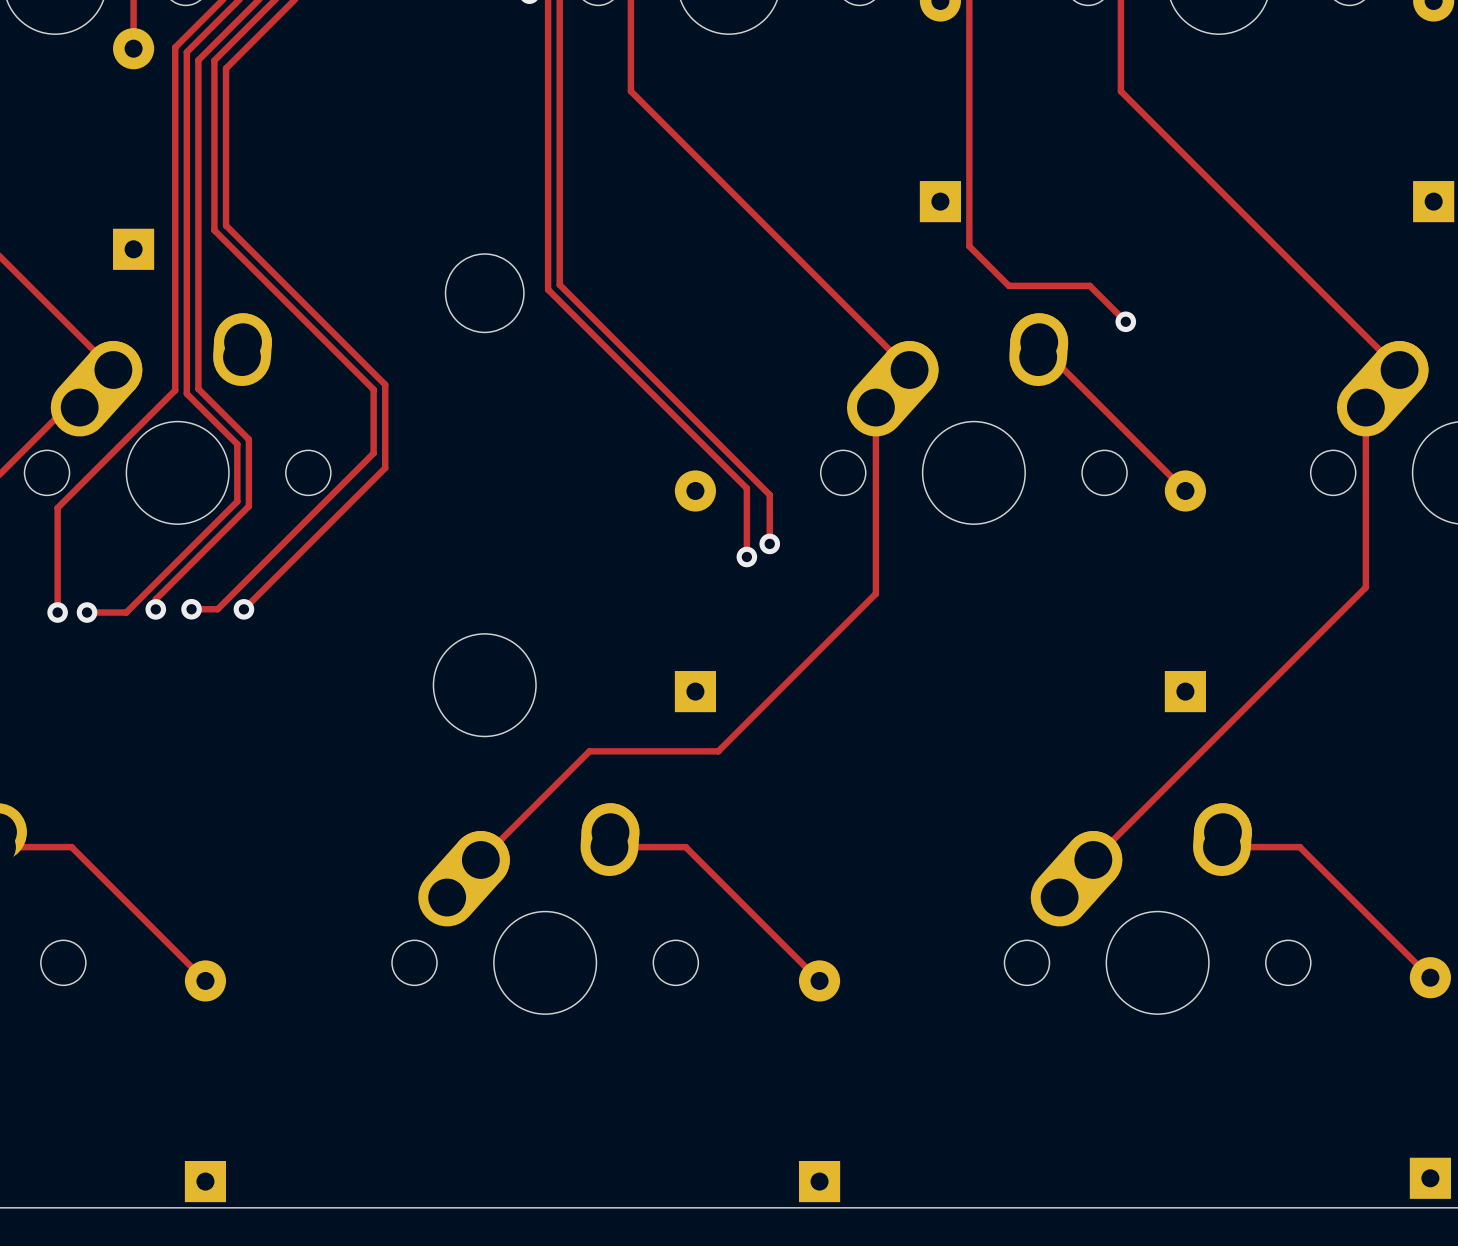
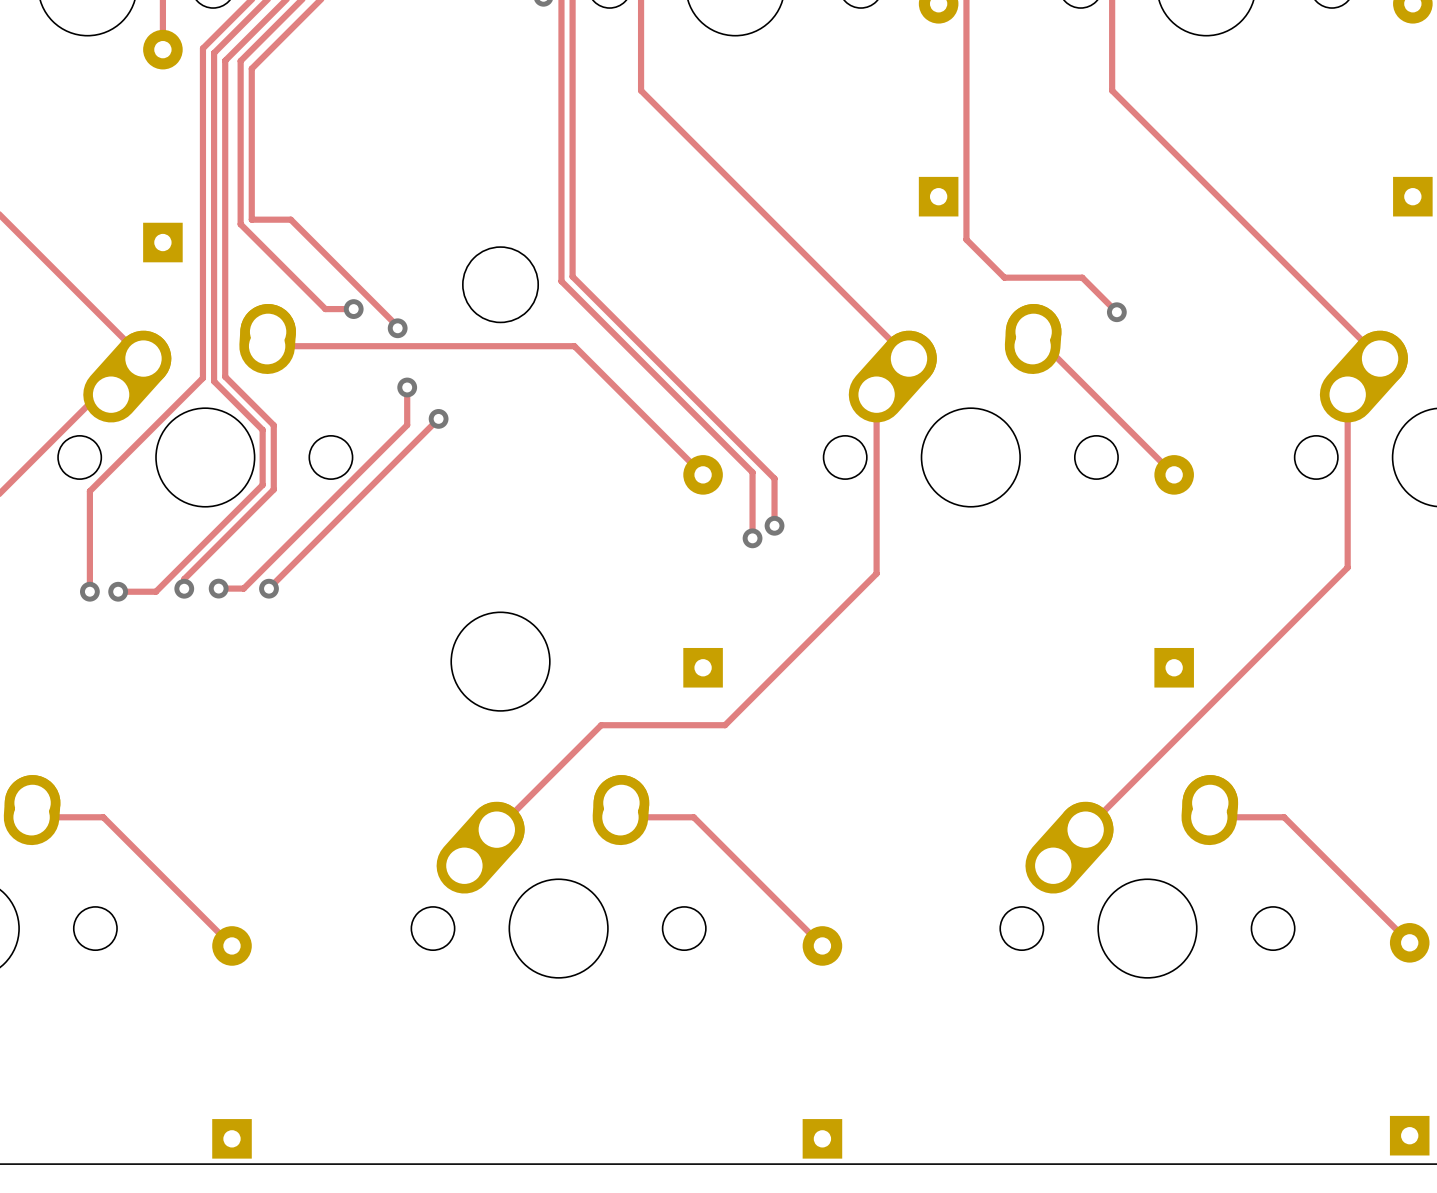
track: (226, 225) (385, 384) (385, 468) (243, 609) -> (438, 418) (268, 588)
track: none -> (251, 219) (290, 219) (397, 328)
track: (302, 318) (373, 389) (373, 453) -> (407, 387) (407, 425) (393, 438)
track: none -> (325, 309) (353, 309)
via: none -> (353, 309)
via: none -> (397, 328)
track: none -> (267, 346) (574, 346) (703, 474)
via: none -> (407, 387)
via: none -> (438, 418)

